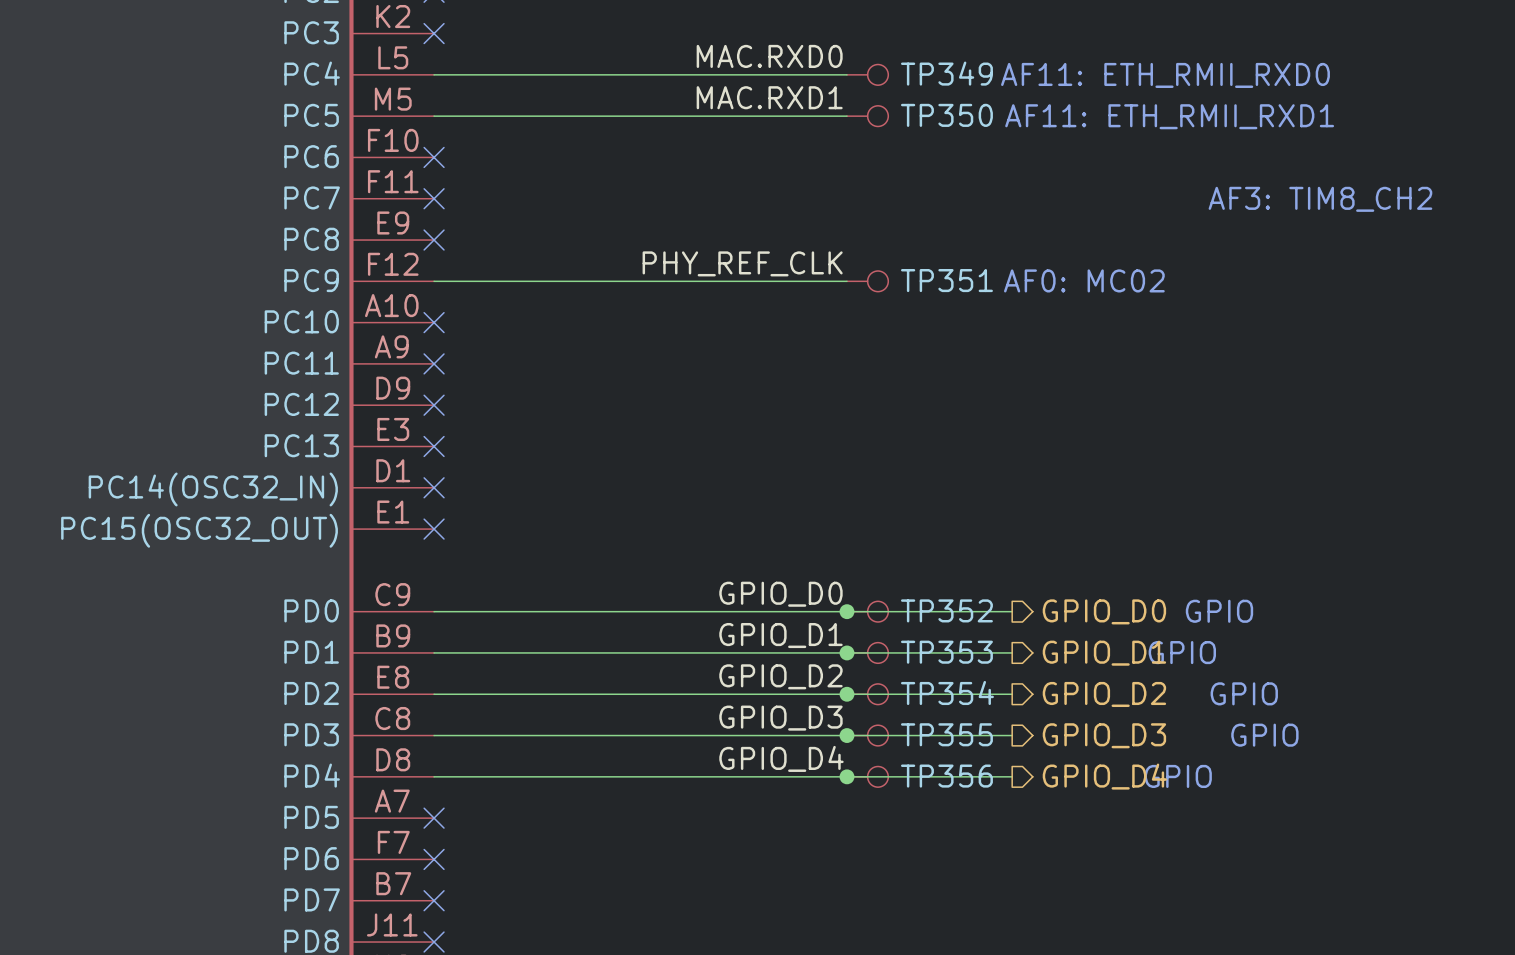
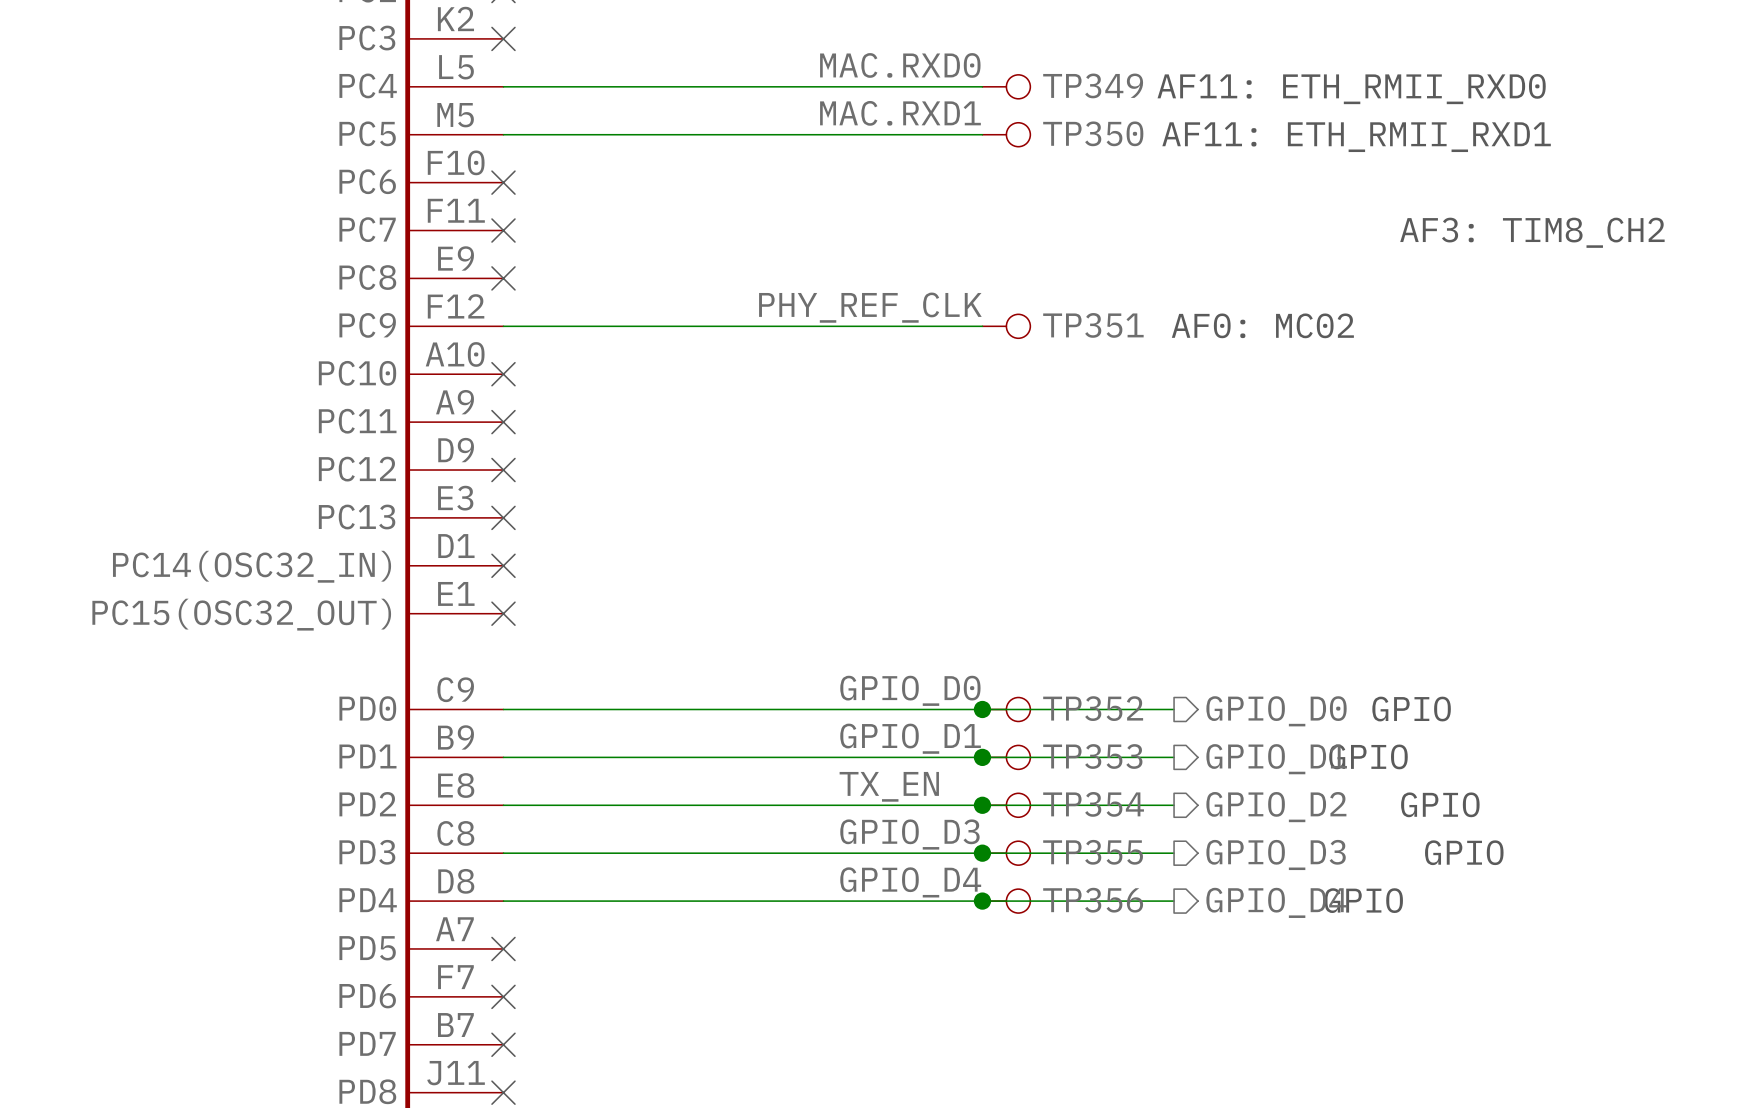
label: none -> TX_EN (889, 786)
label: GPIO_D2 (780, 676) -> none

